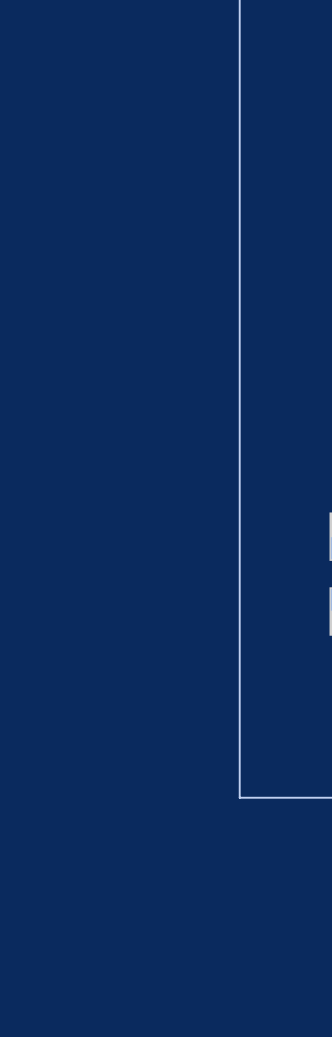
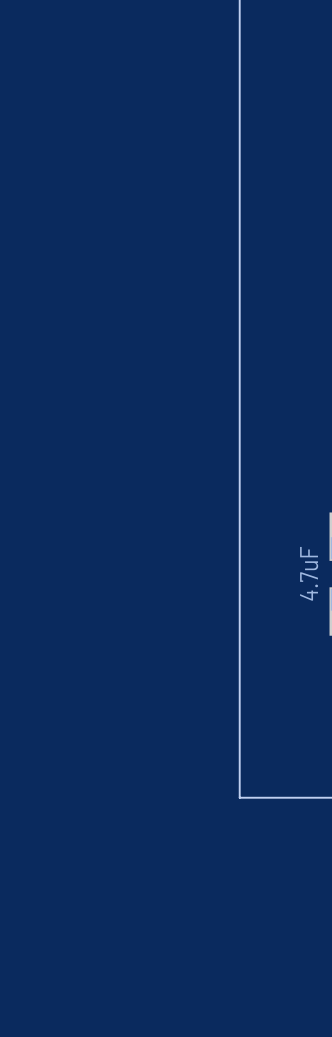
part value: none -> 4.7uF (309, 573)

